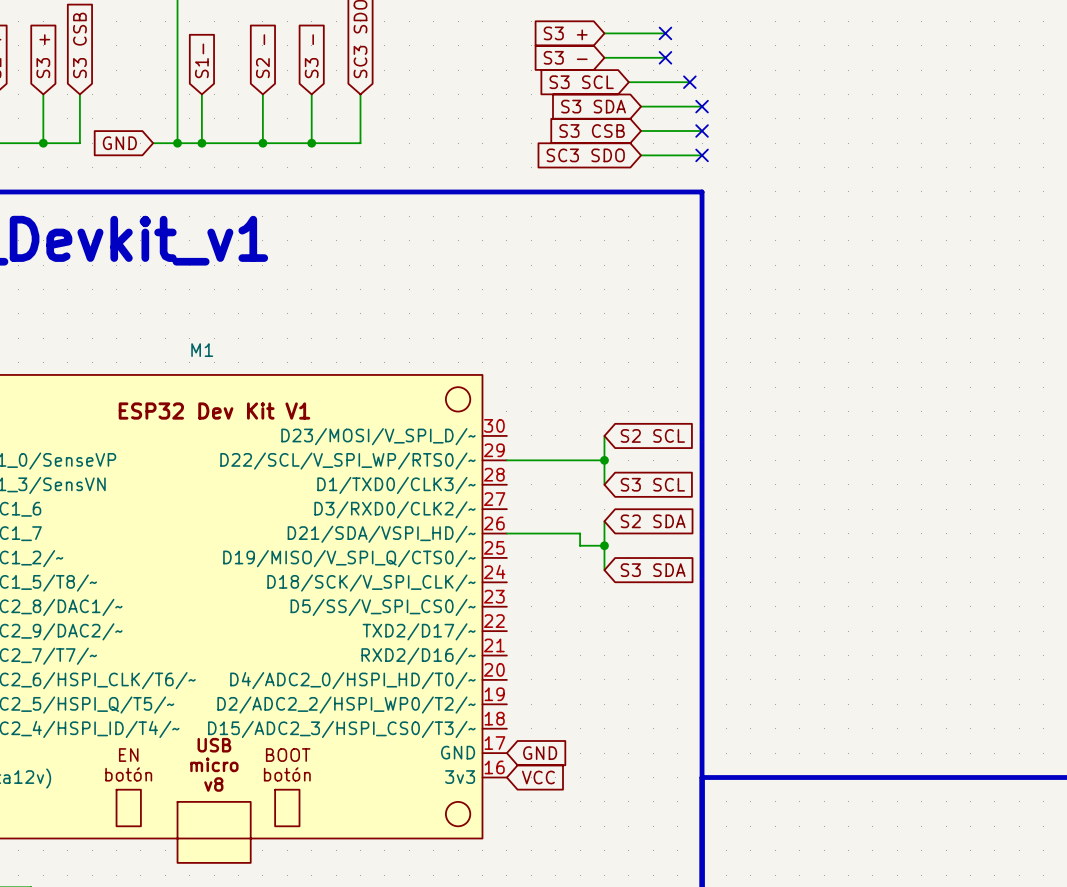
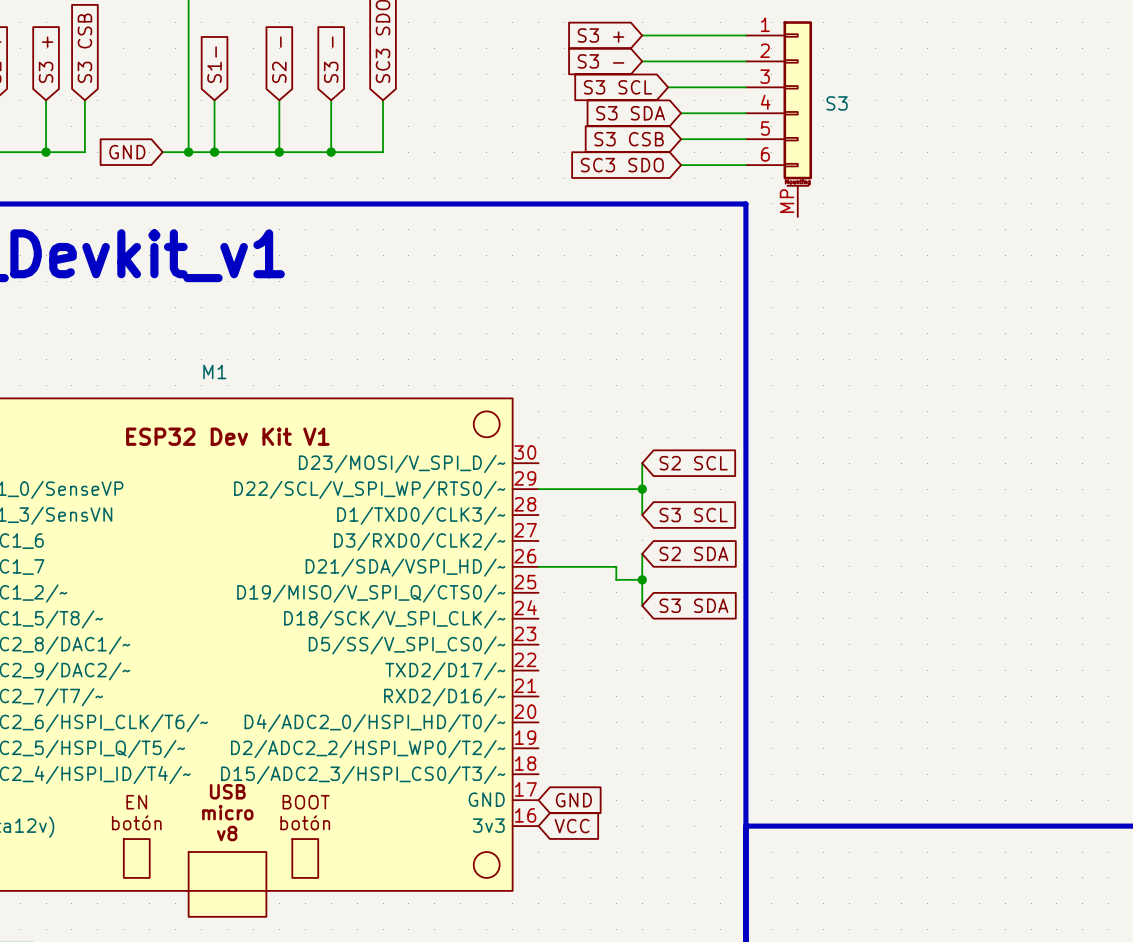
wire: none -> (707, 35) (745, 35)
no-connect mark: (665, 33) -> none
wire: none -> (707, 61) (745, 61)
no-connect mark: (665, 57) -> none
wire: none -> (732, 87) (745, 87)
no-connect mark: (689, 82) -> none
no-connect mark: (702, 106) -> none
S3: none -> (778, 119)
no-connect mark: (702, 131) -> none
no-connect mark: (702, 155) -> none

